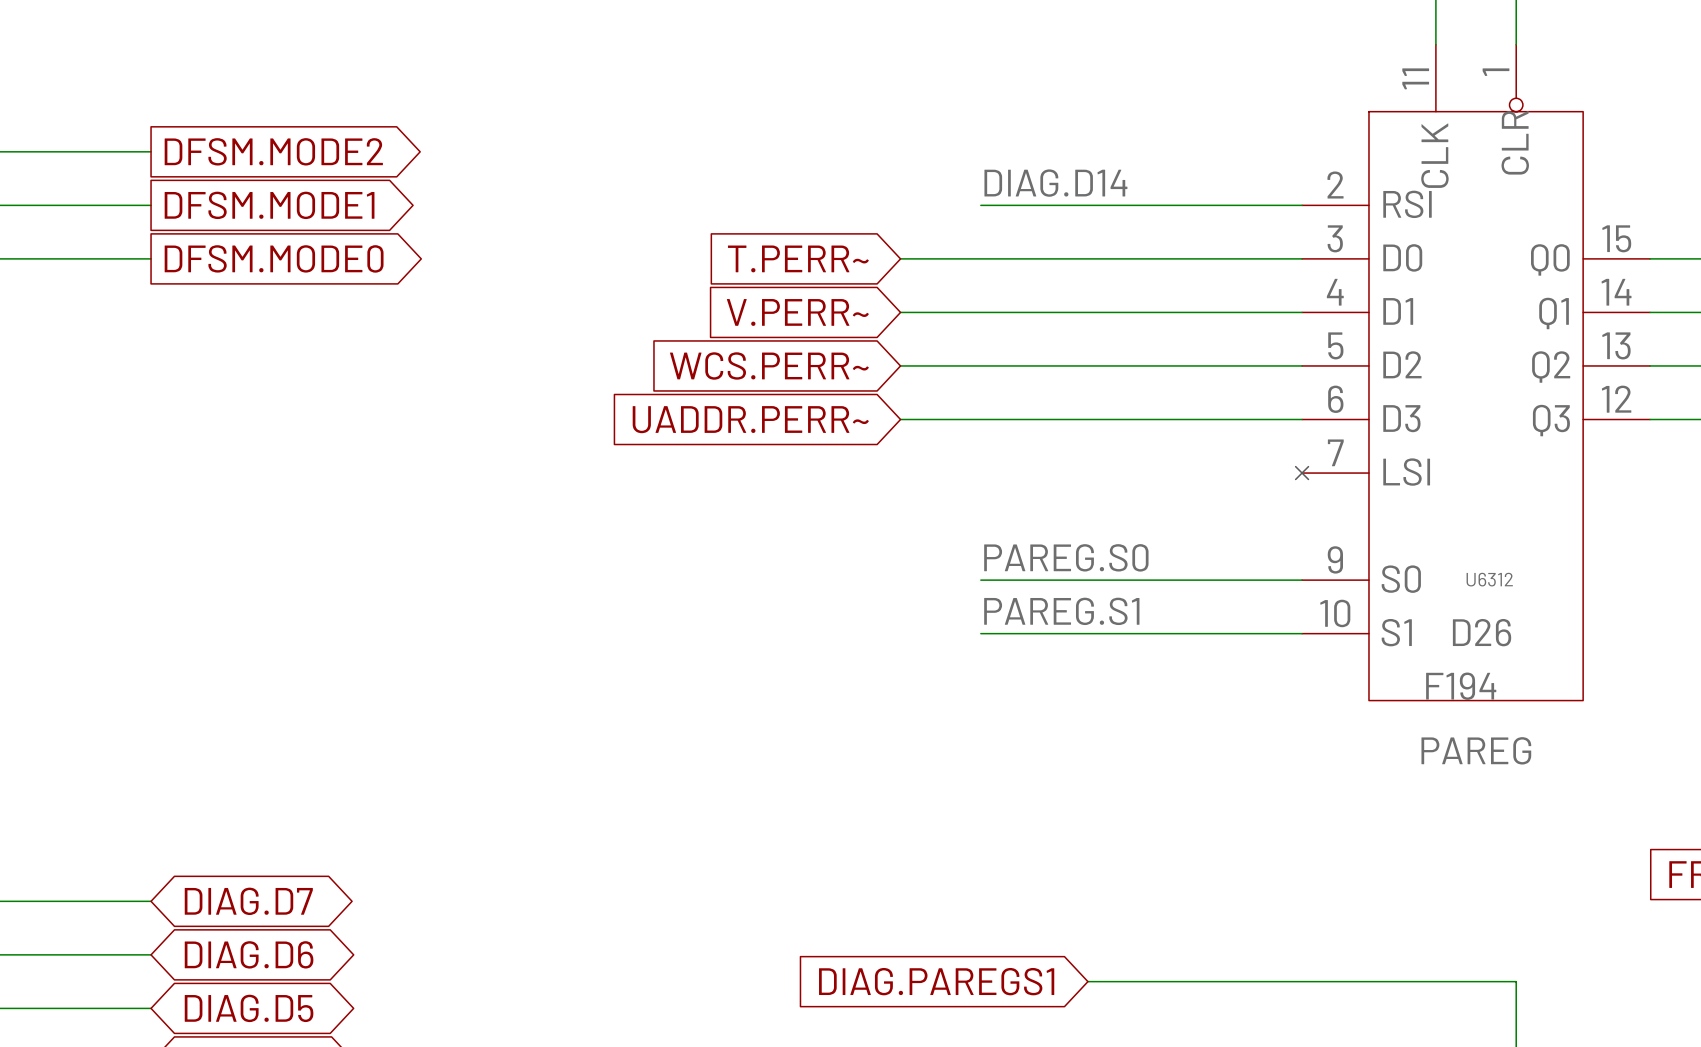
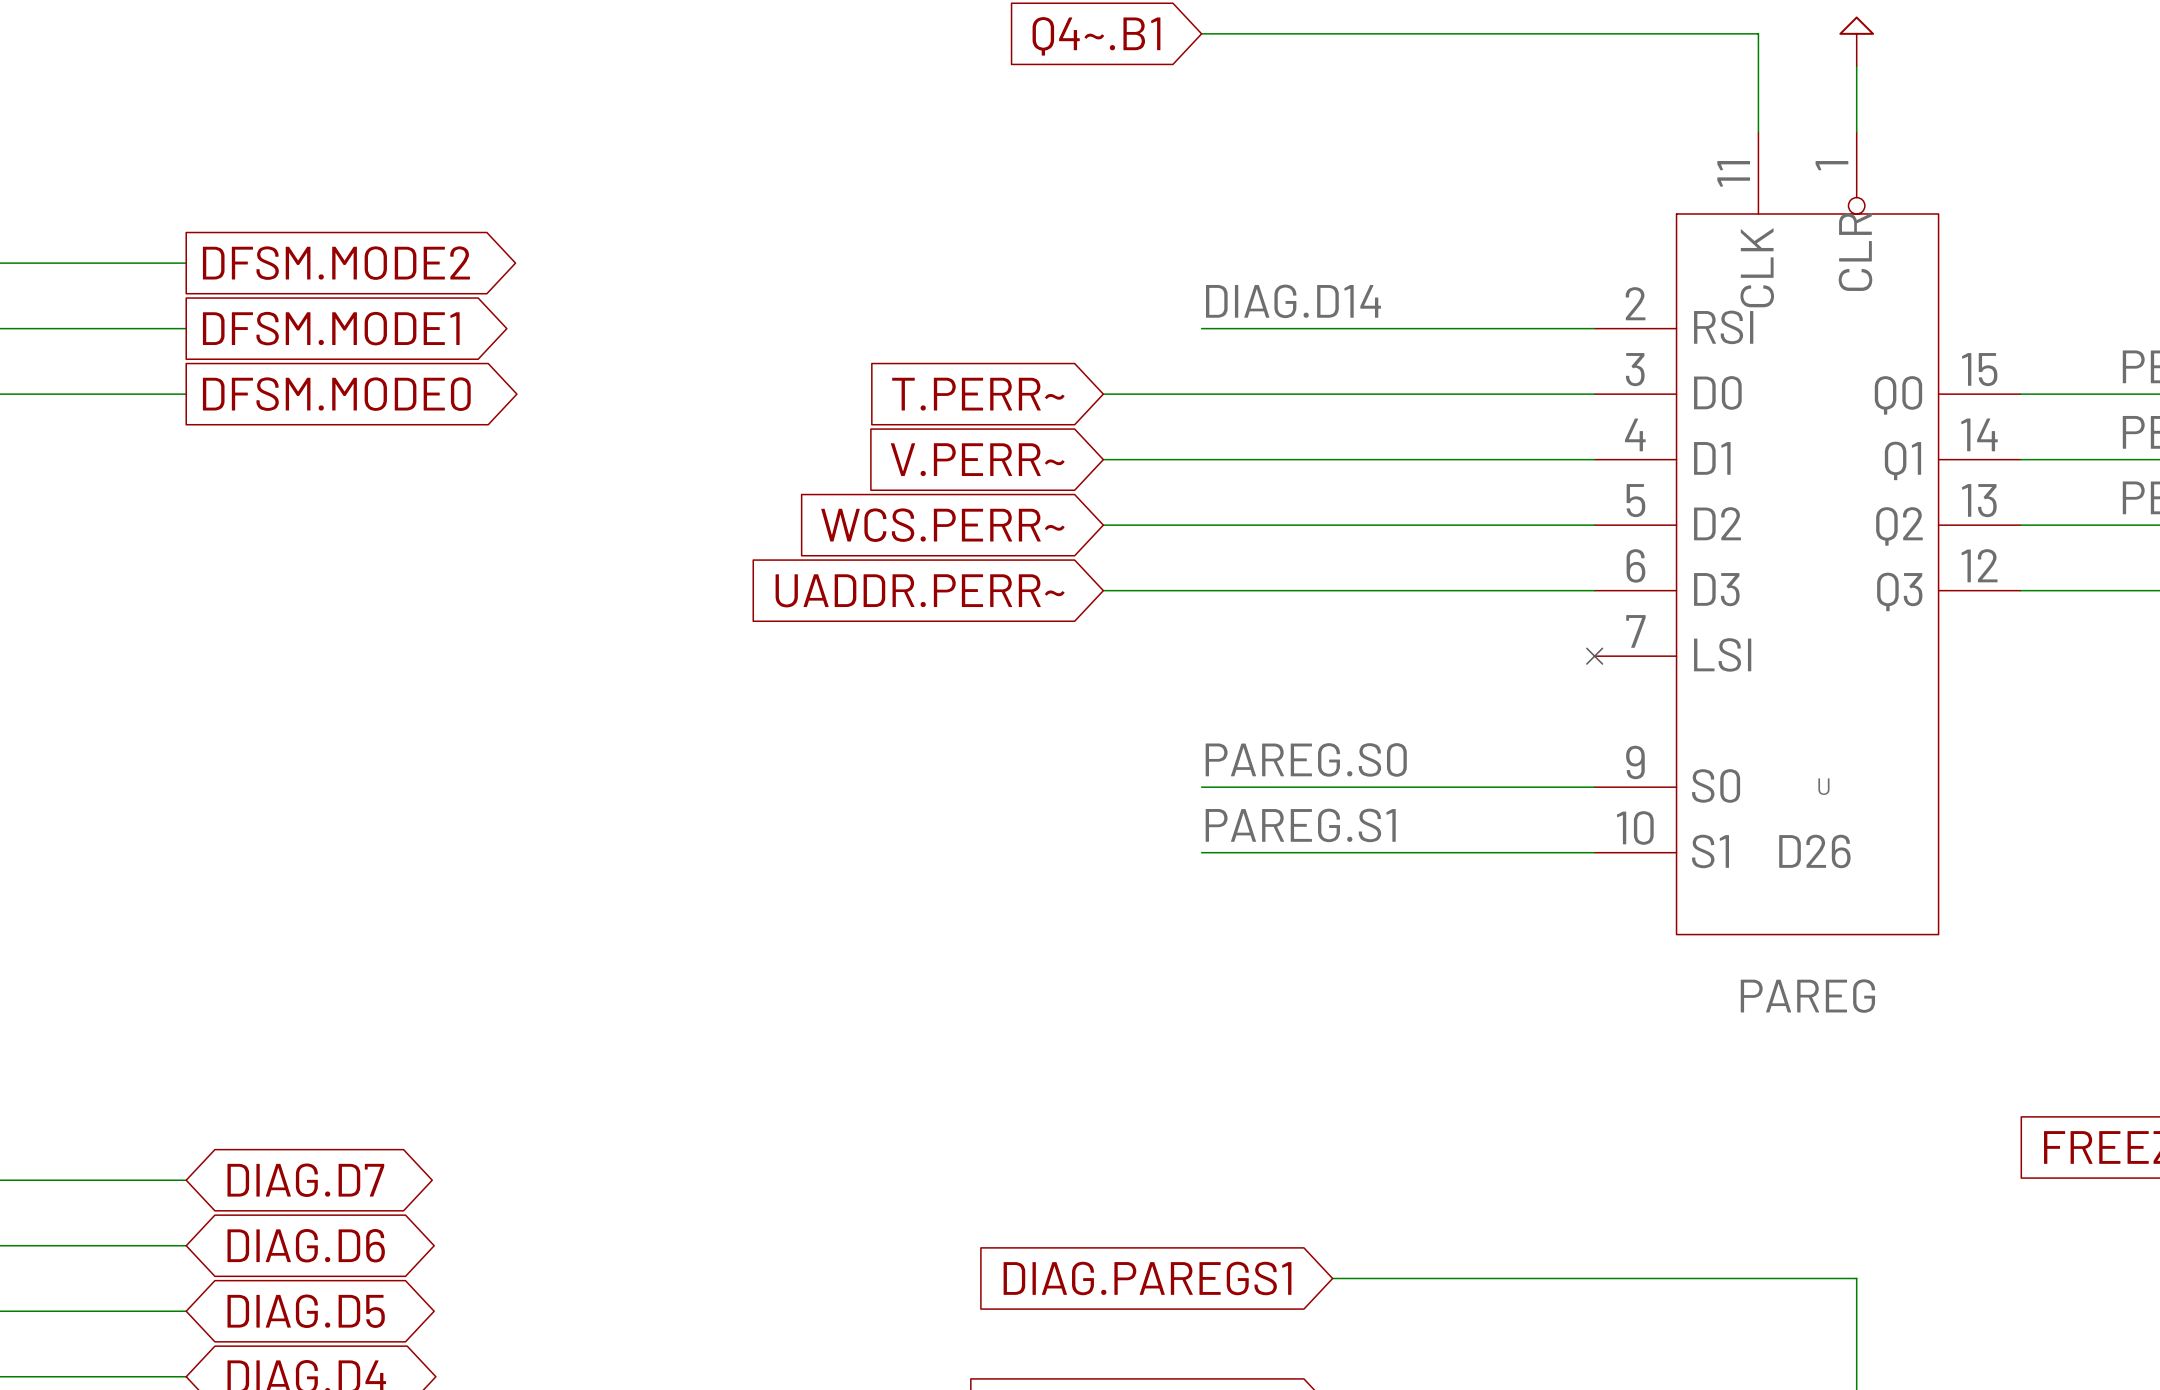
U6312 name: U6312 (1489, 579) -> U (1823, 786)
U6312 value: F194 (1461, 686) -> none

